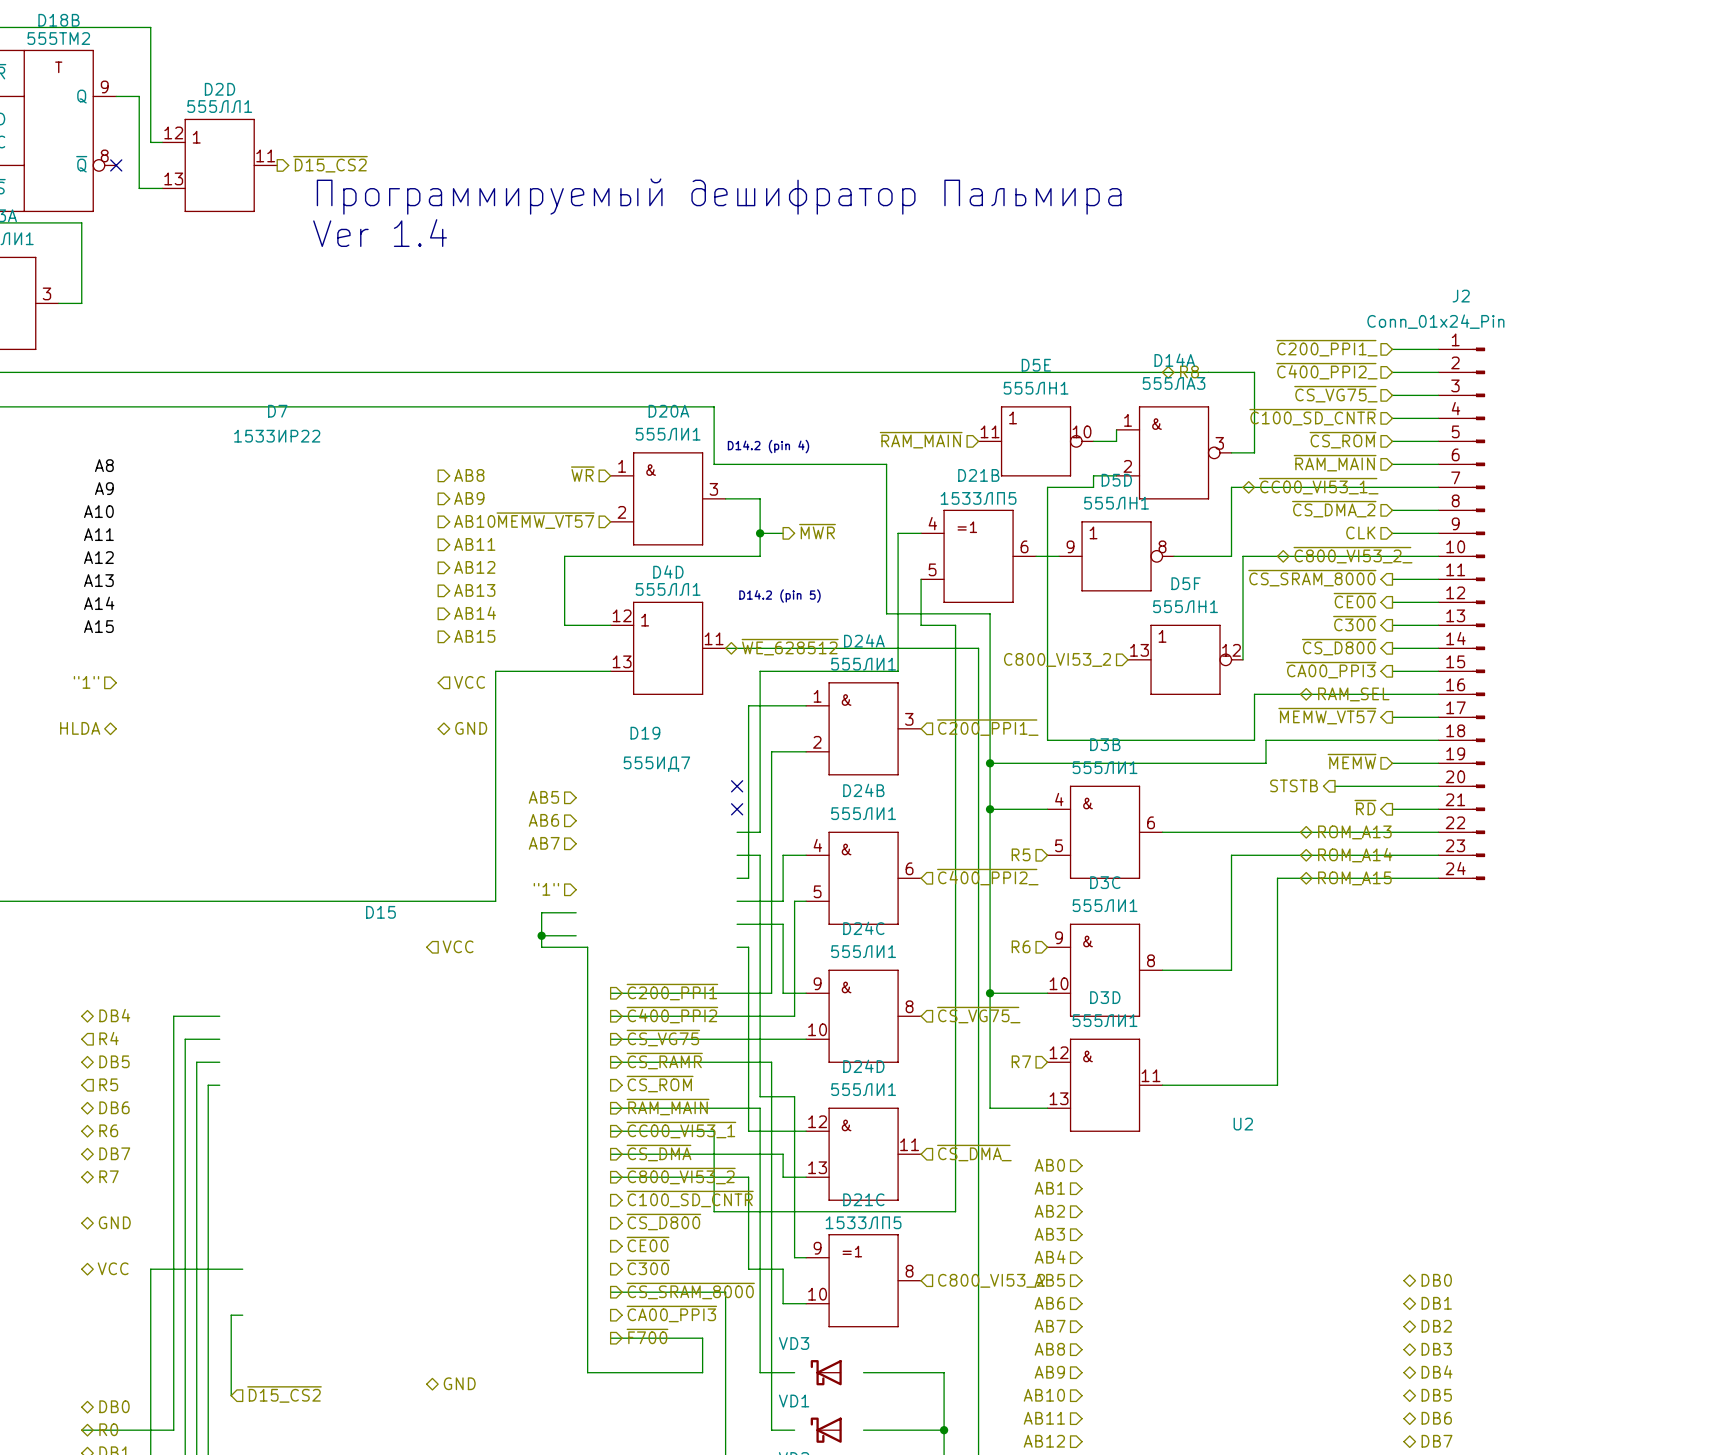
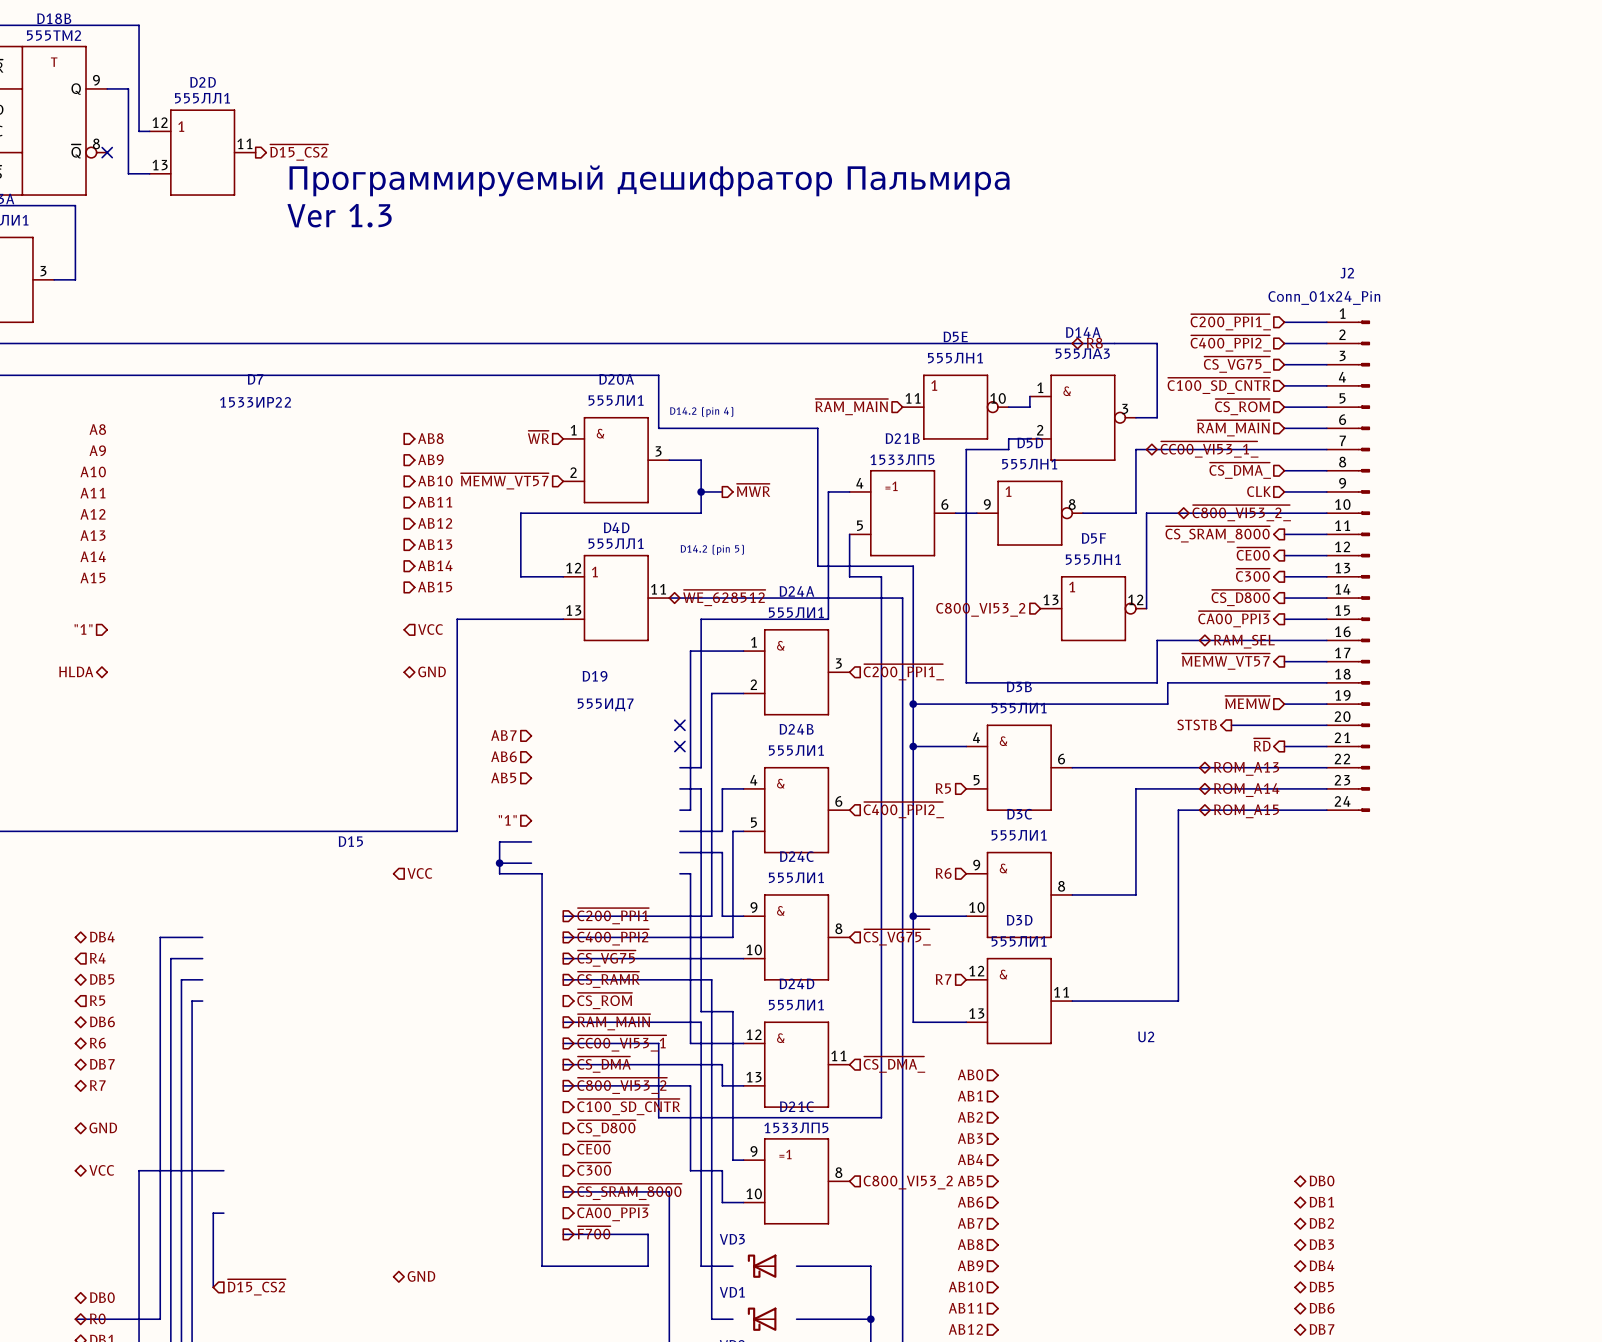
text: Ver 1.4 (380, 233) -> Ver 1.3 (339, 215)
hierarchical label: ~{CS_DMA_2} (1334, 509) -> ~{CS_DMA_} (1240, 470)
hierarchical label: AB5 (543, 797) -> AB7 (503, 735)
hierarchical label: AB7 (544, 843) -> AB5 (503, 777)

